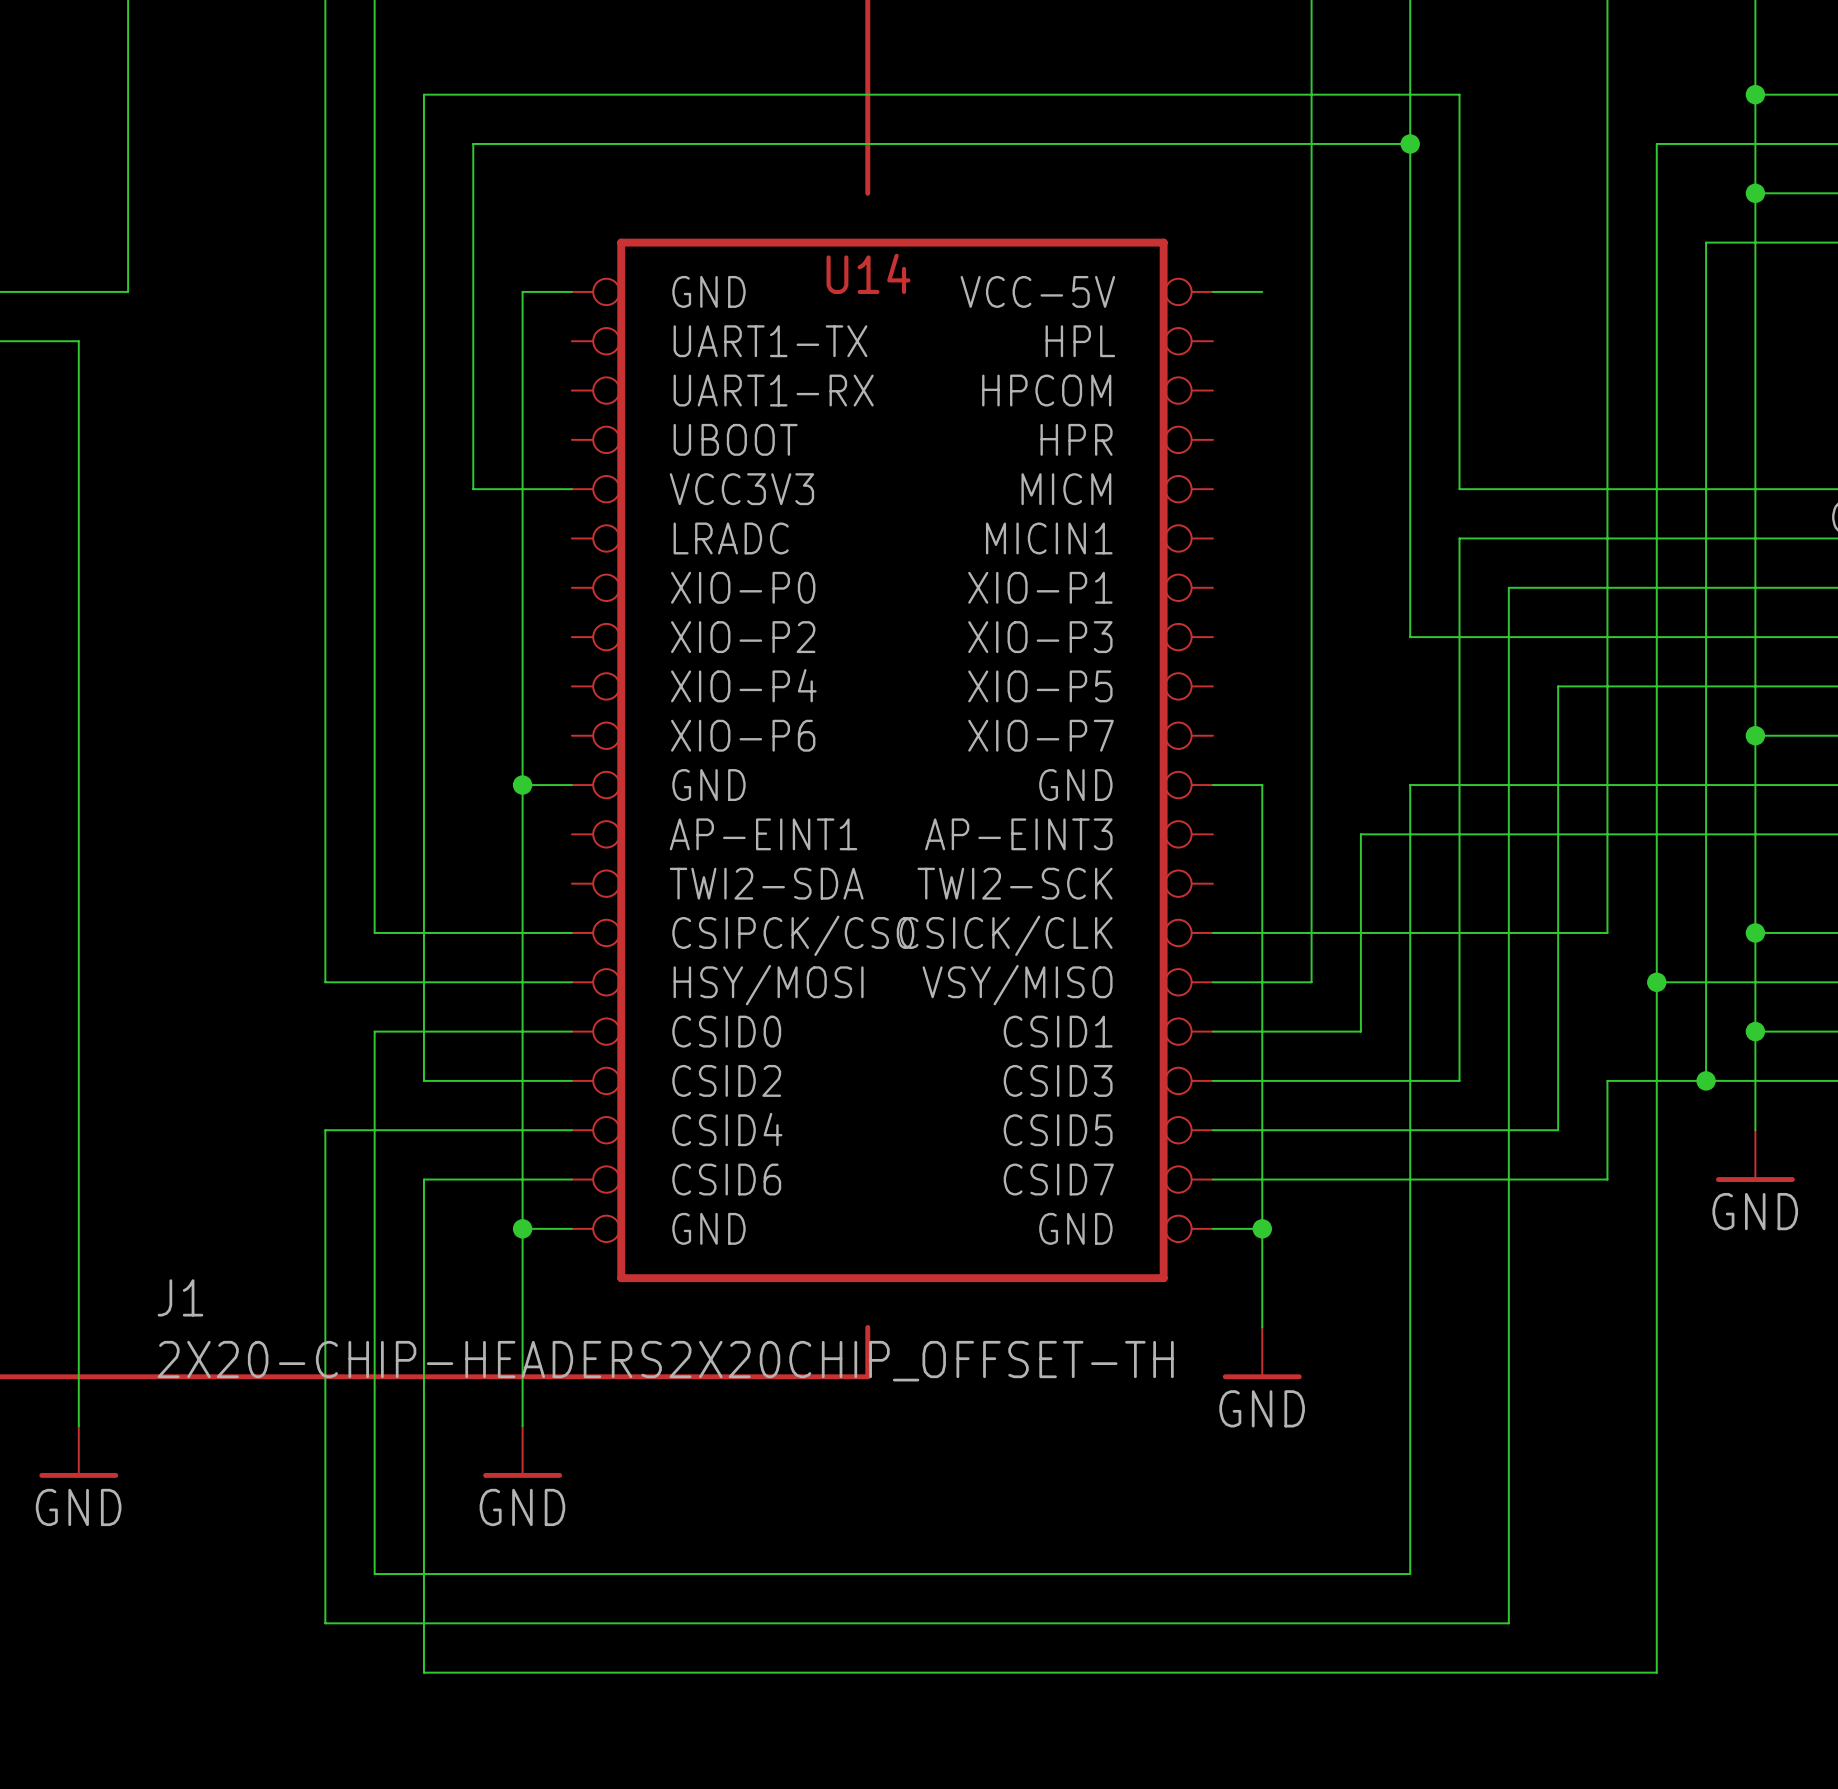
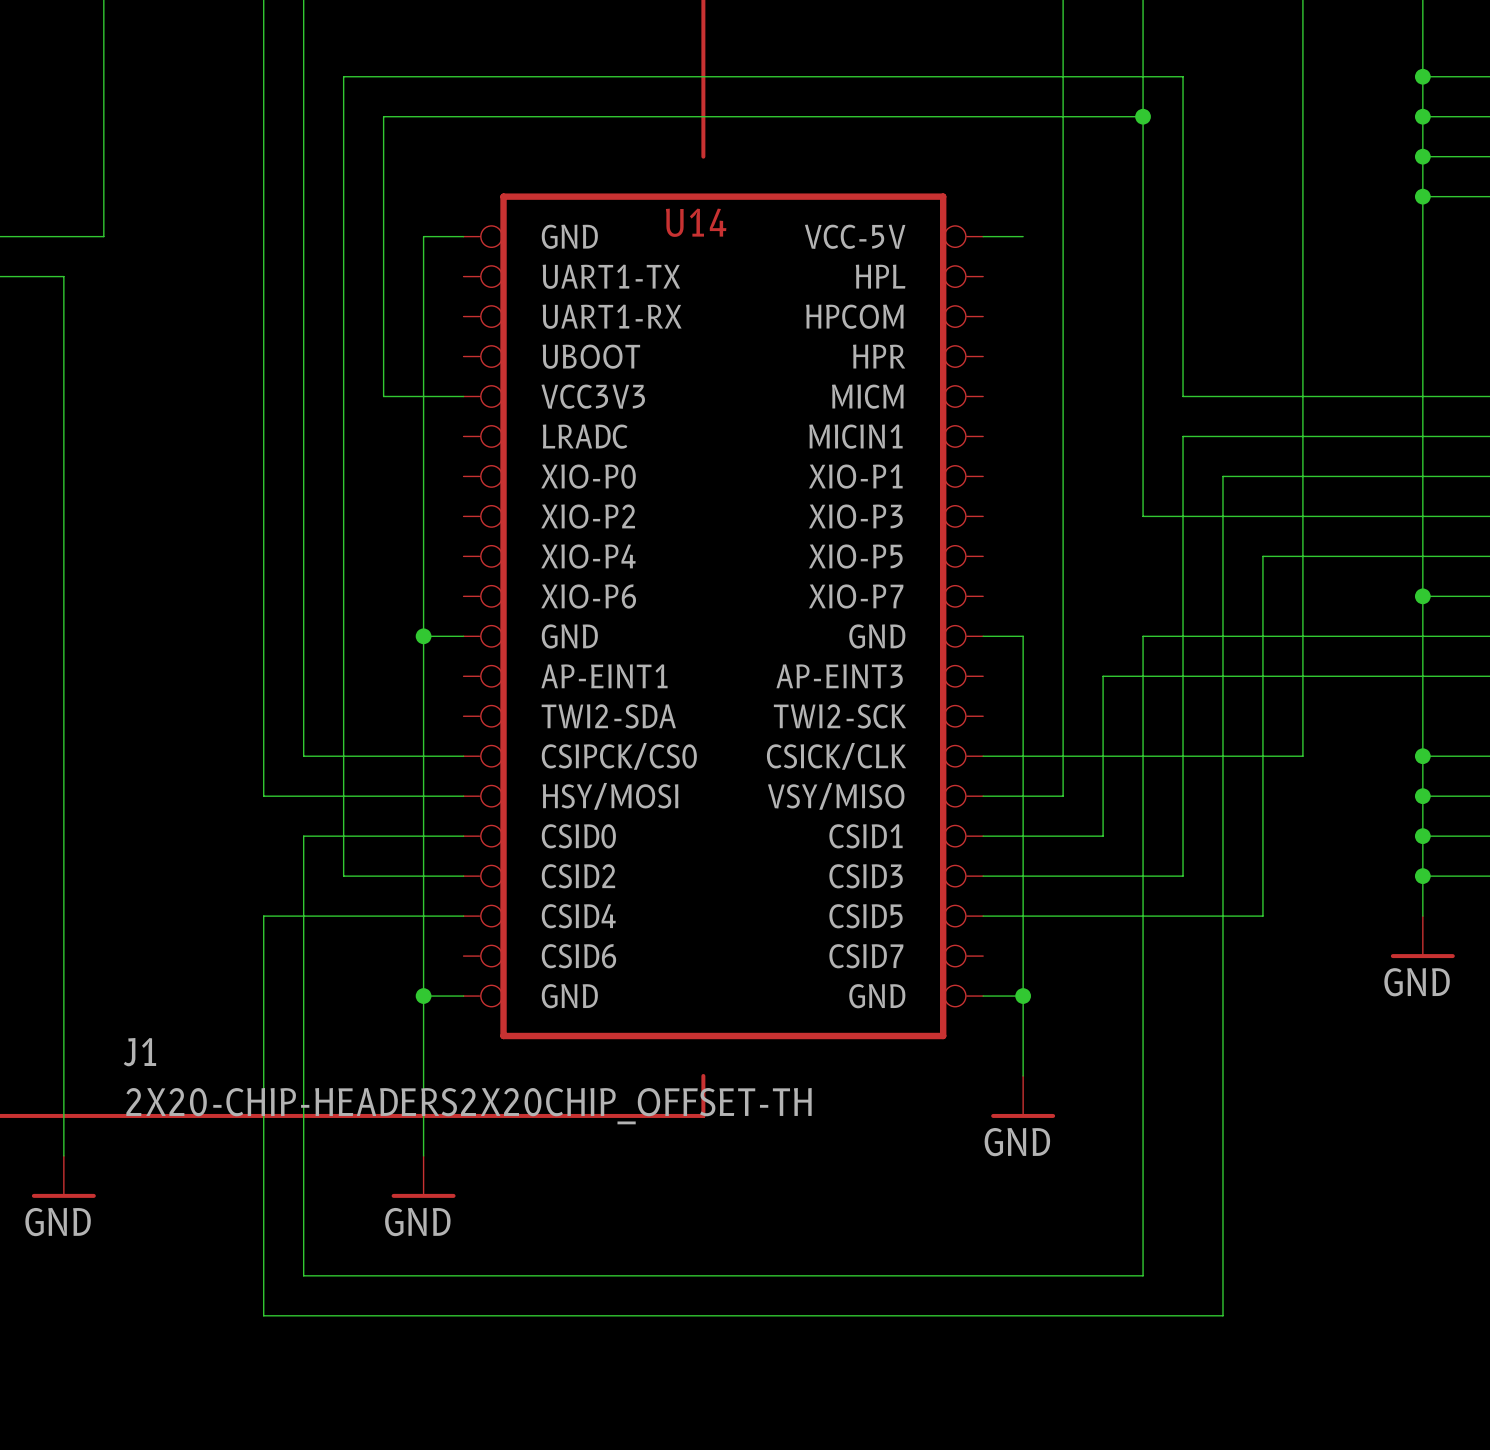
wire: (1755, 143) (1656, 143) (1656, 1672) (423, 1672) (423, 1179) (571, 1179) -> none
junction: none -> (1422, 116)
wire: (1755, 242) (1706, 242) (1706, 1080) -> none
junction: none -> (1422, 196)
wire: (1656, 982) (1755, 982) -> none
junction: (1656, 982) -> none
junction: none -> (1422, 796)
junction position: (1706, 1080) -> (1422, 876)
wire: (1755, 1080) (1607, 1080) (1607, 1179) (1212, 1179) -> none

